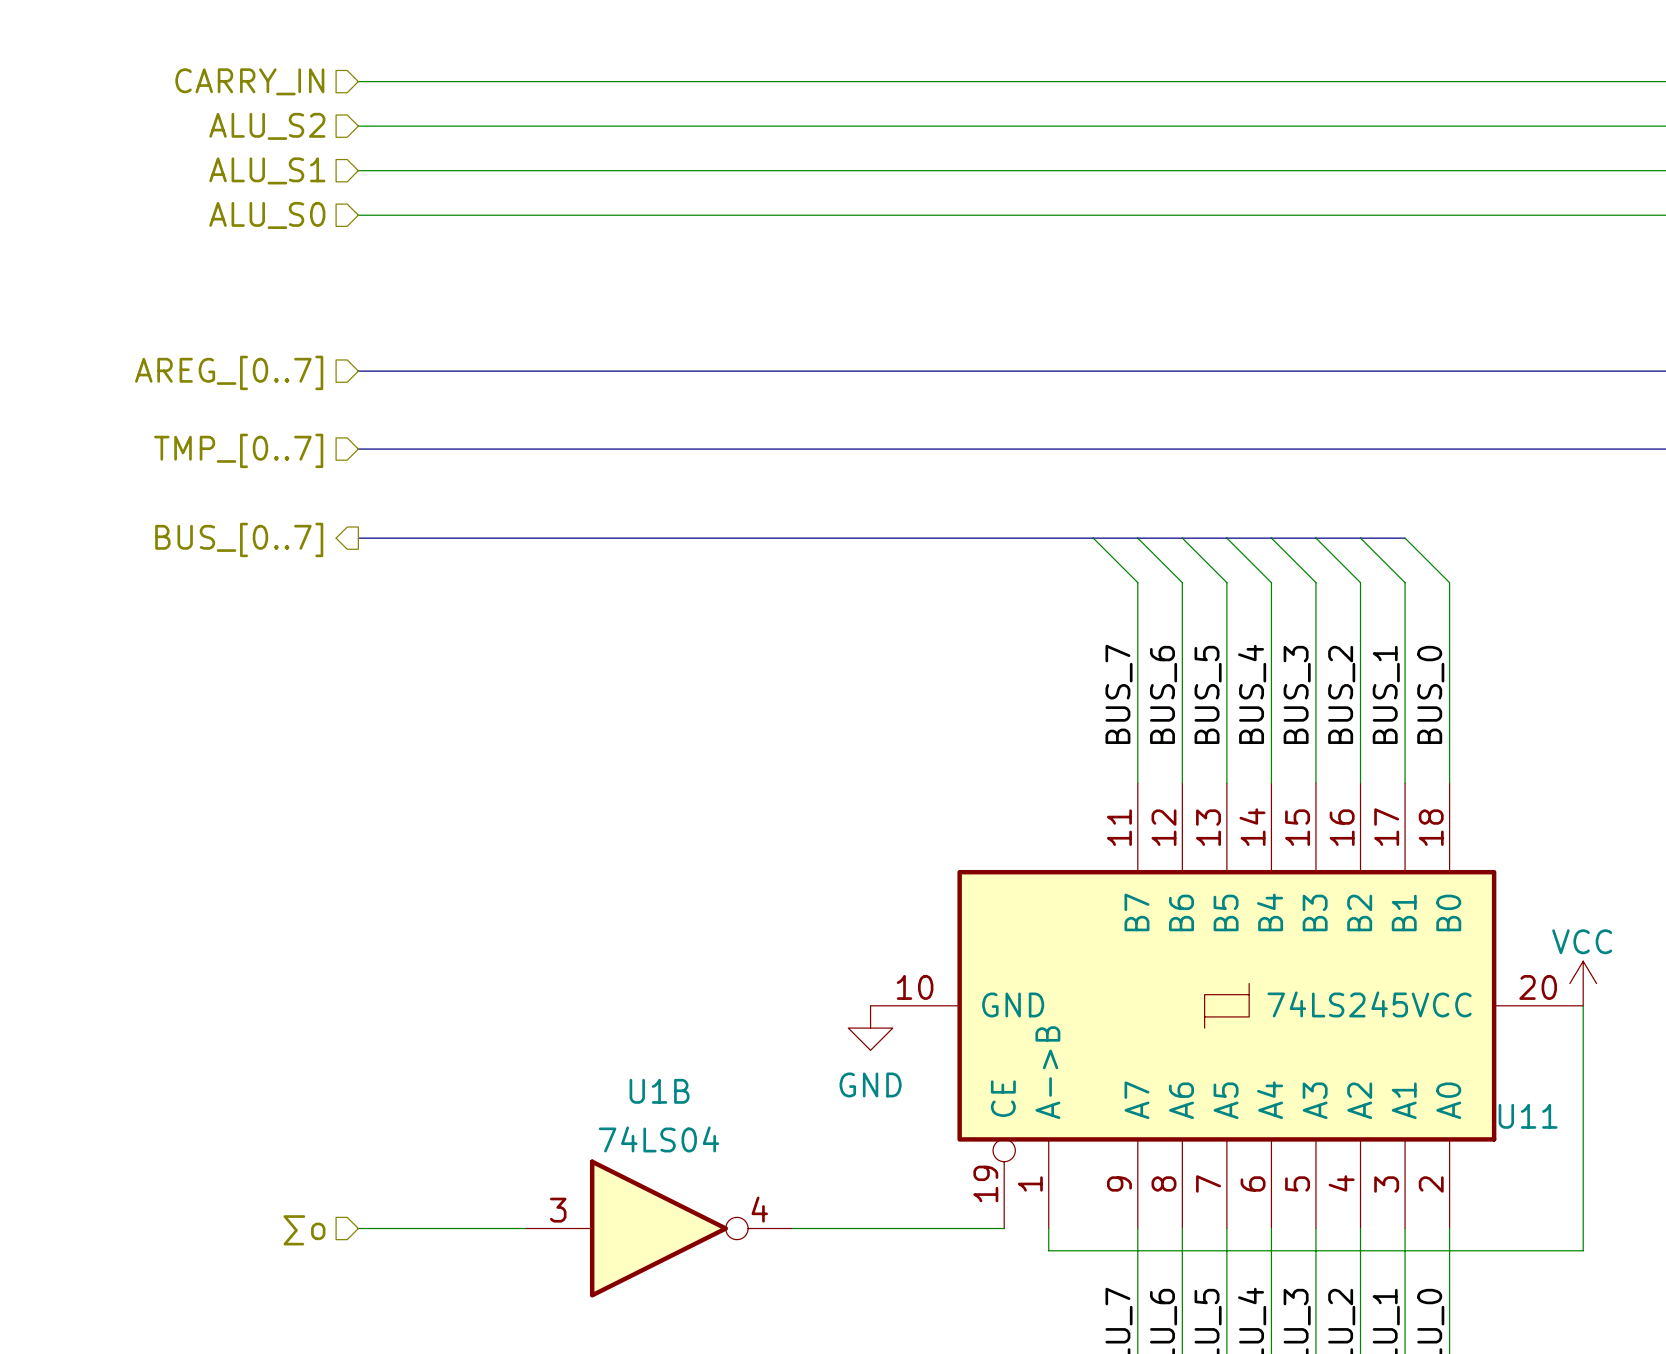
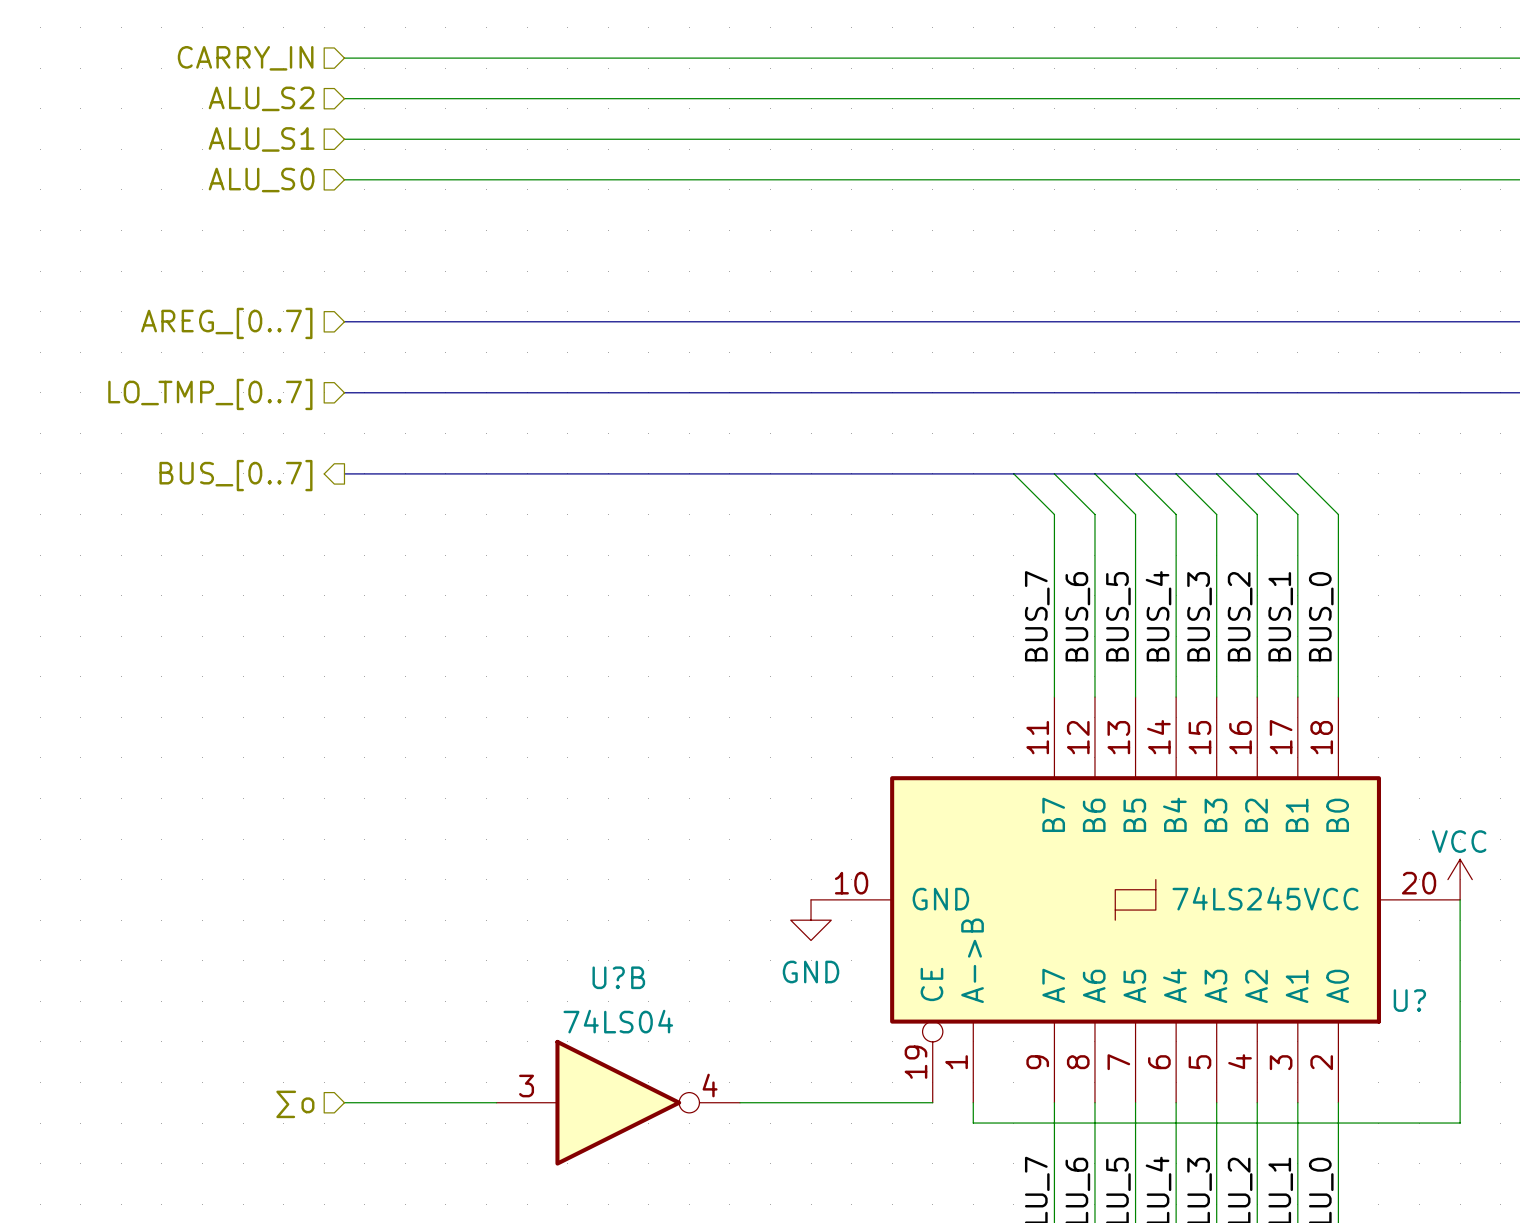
hierarchical label: TMP_[0..7] (238, 450) -> LO_TMP_[0..7] (210, 394)
U1B name: U1B (659, 1091) -> U?B (618, 977)
U11 name: U11 (1528, 1116) -> U? (1409, 1000)

